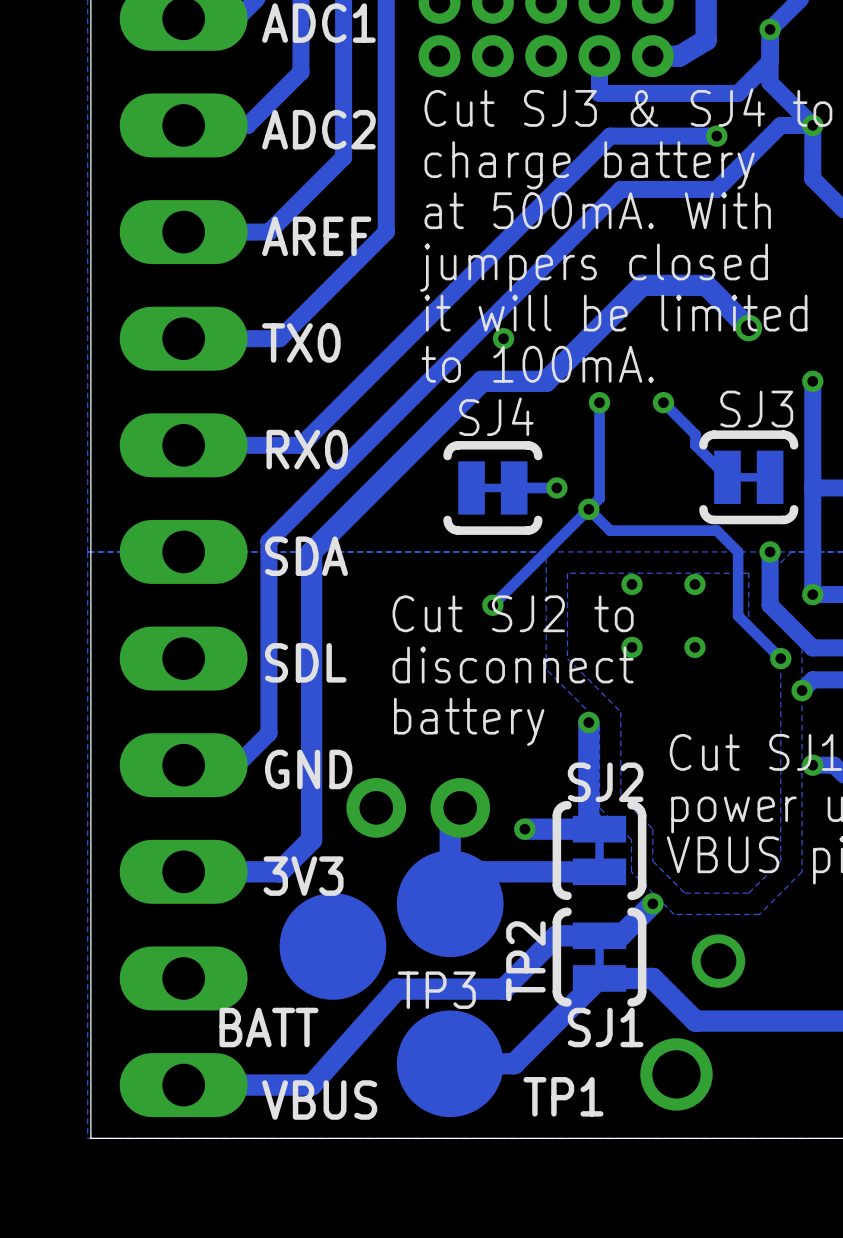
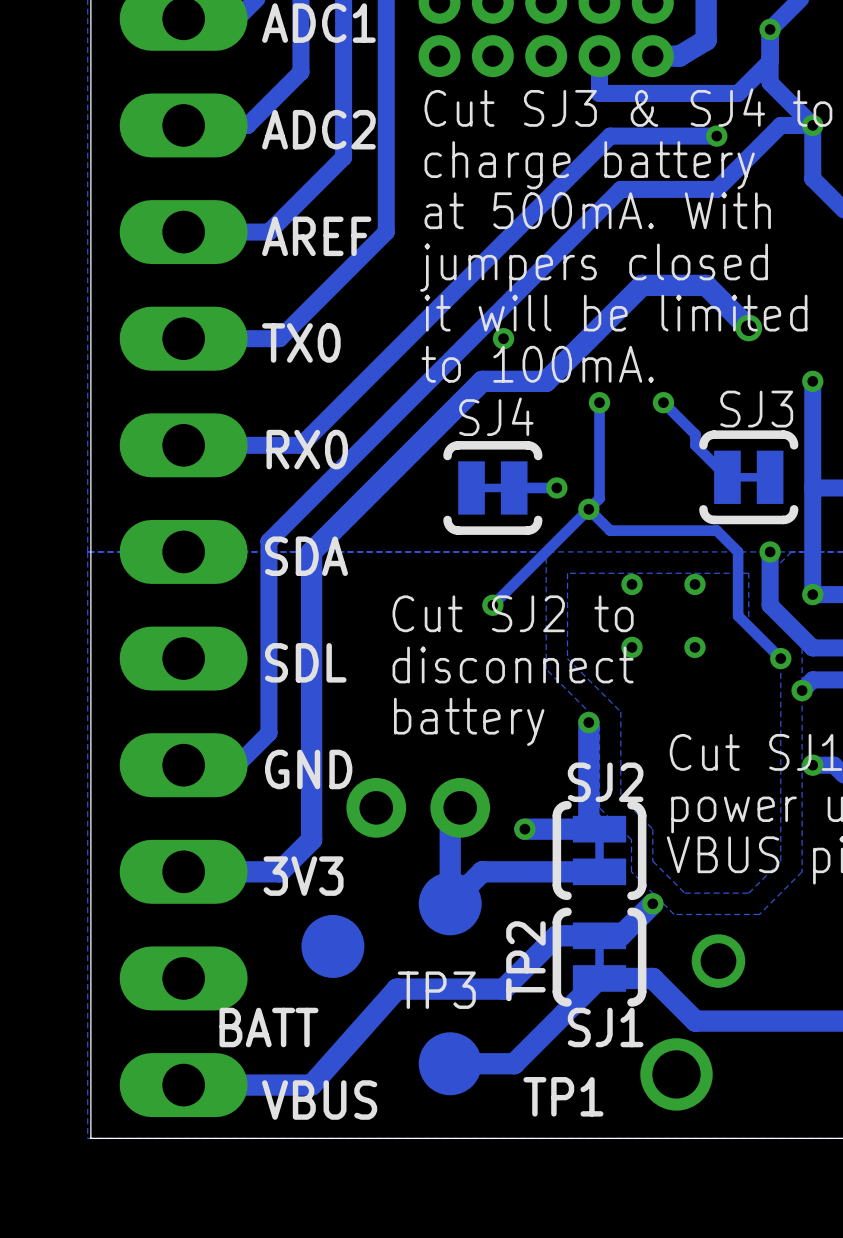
TP2 footprint: [396, 850, 504, 958] -> [418, 872, 482, 936]
TP3 footprint: [279, 893, 387, 1000] -> [301, 914, 365, 978]
TP1 footprint: [396, 1010, 504, 1118] -> [418, 1032, 482, 1096]

